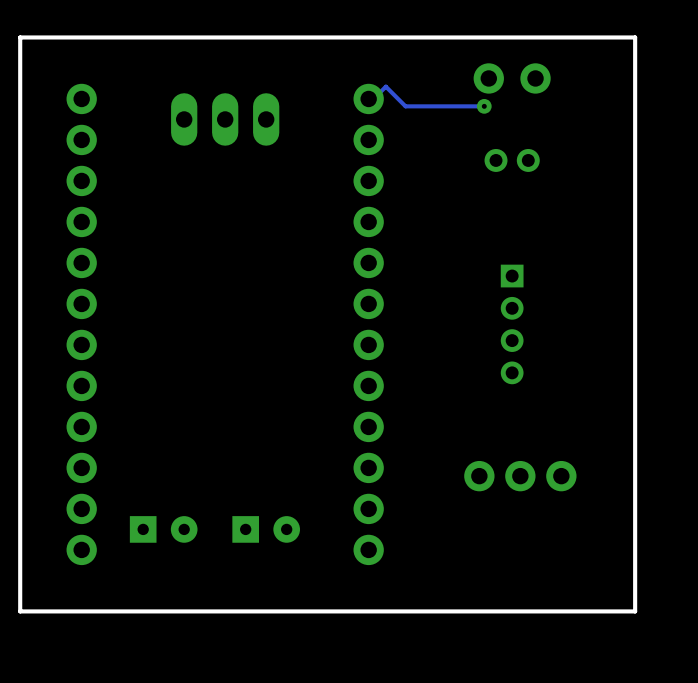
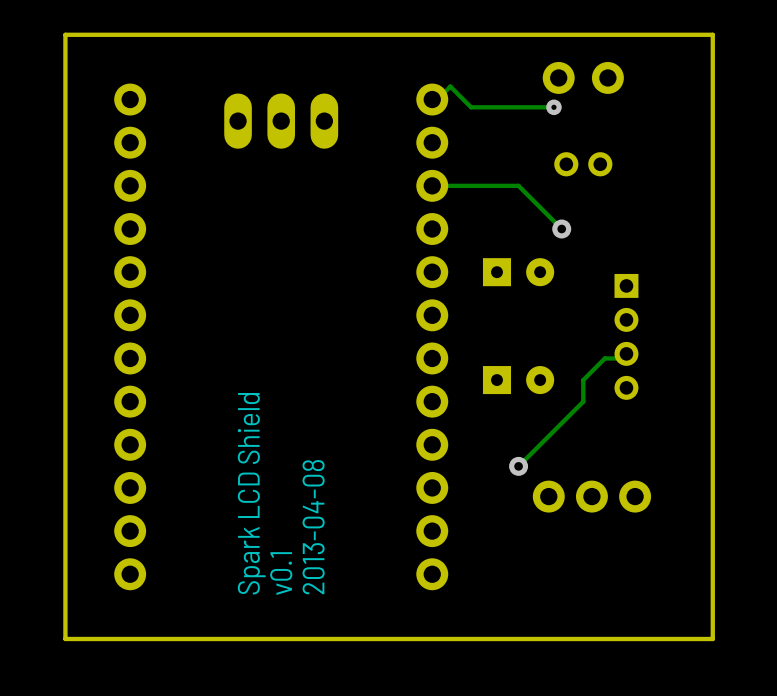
track: none -> (432, 185) (518, 185) (561, 229)
via: none -> (561, 229)
part: none -> (518, 272)
part position: (512, 324) -> (626, 336)
track: none -> (626, 353) (626, 358) (604, 358) (583, 380) (583, 401) (518, 466)
part: none -> (518, 380)
text: none -> Spark LCD Shield (251, 493)
via: none -> (518, 466)
text: none -> 2013-04-08 (313, 527)
part: (163, 529) -> none
part: (266, 529) -> none
text: none -> v0.1 (281, 573)

